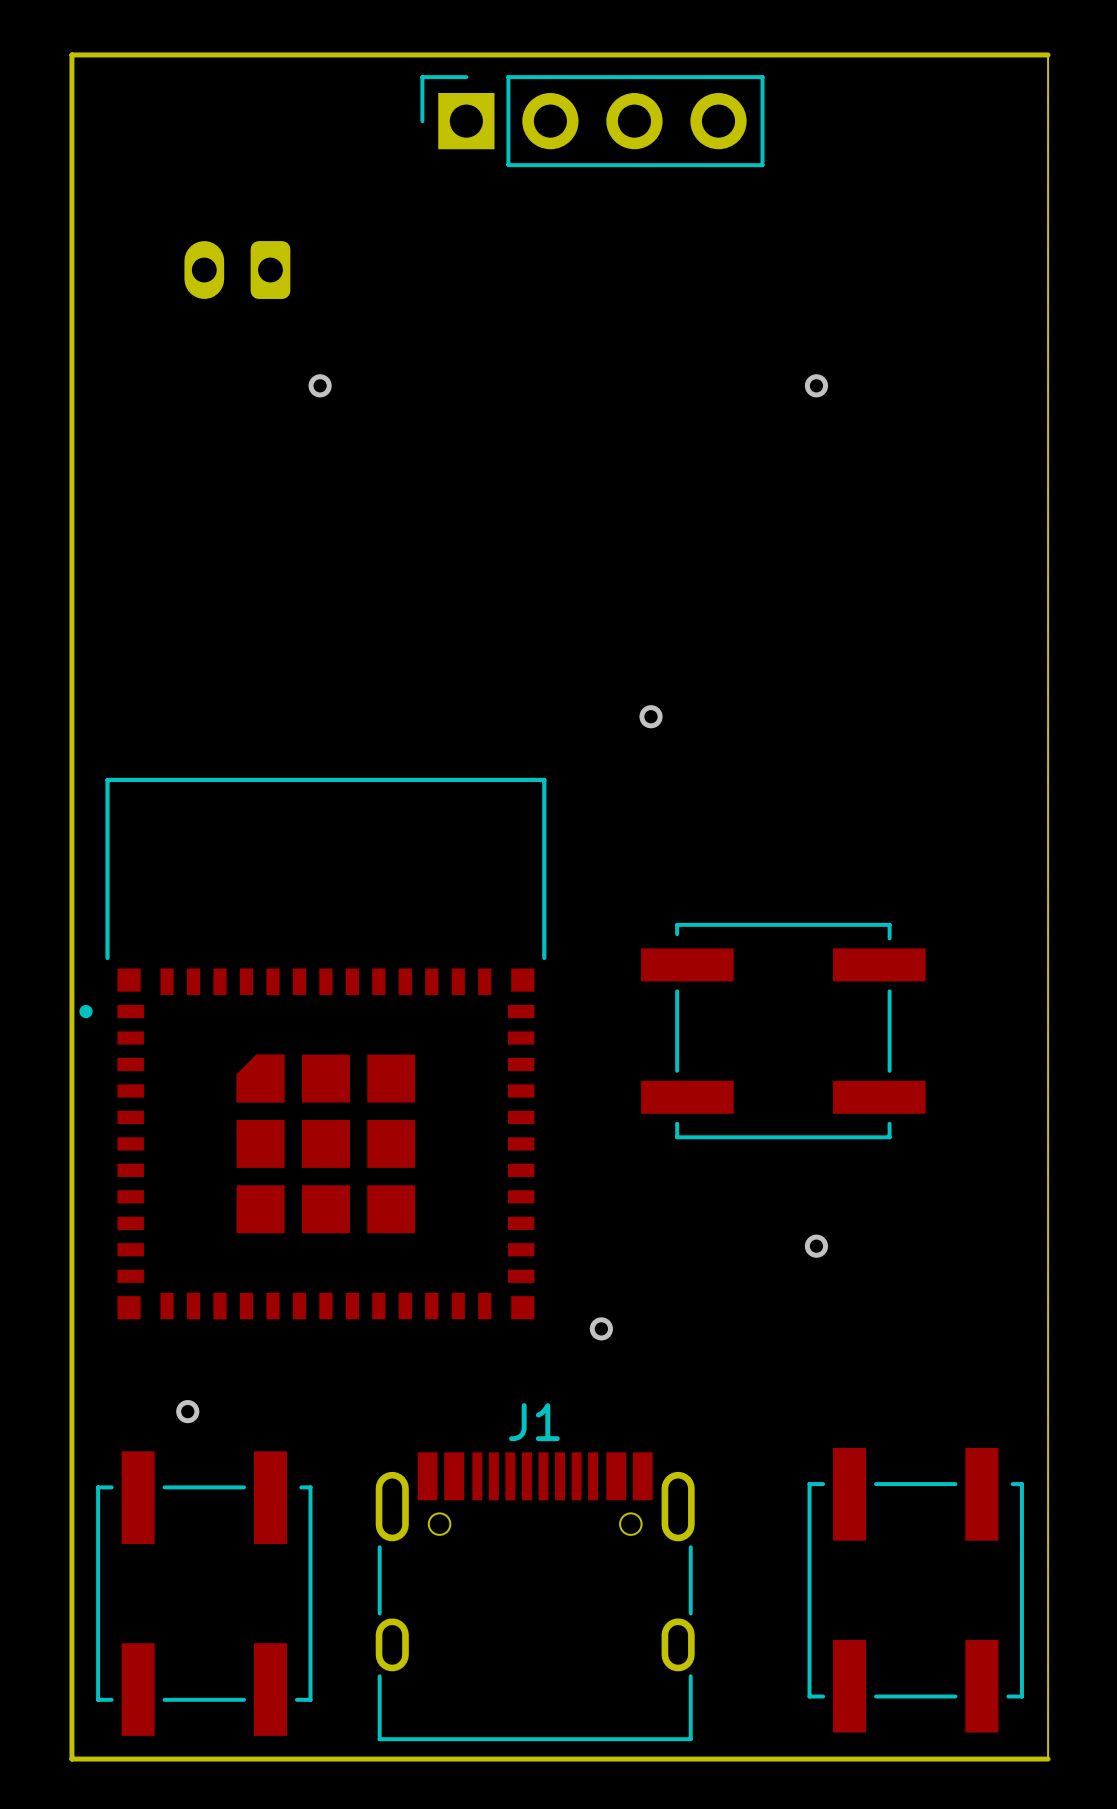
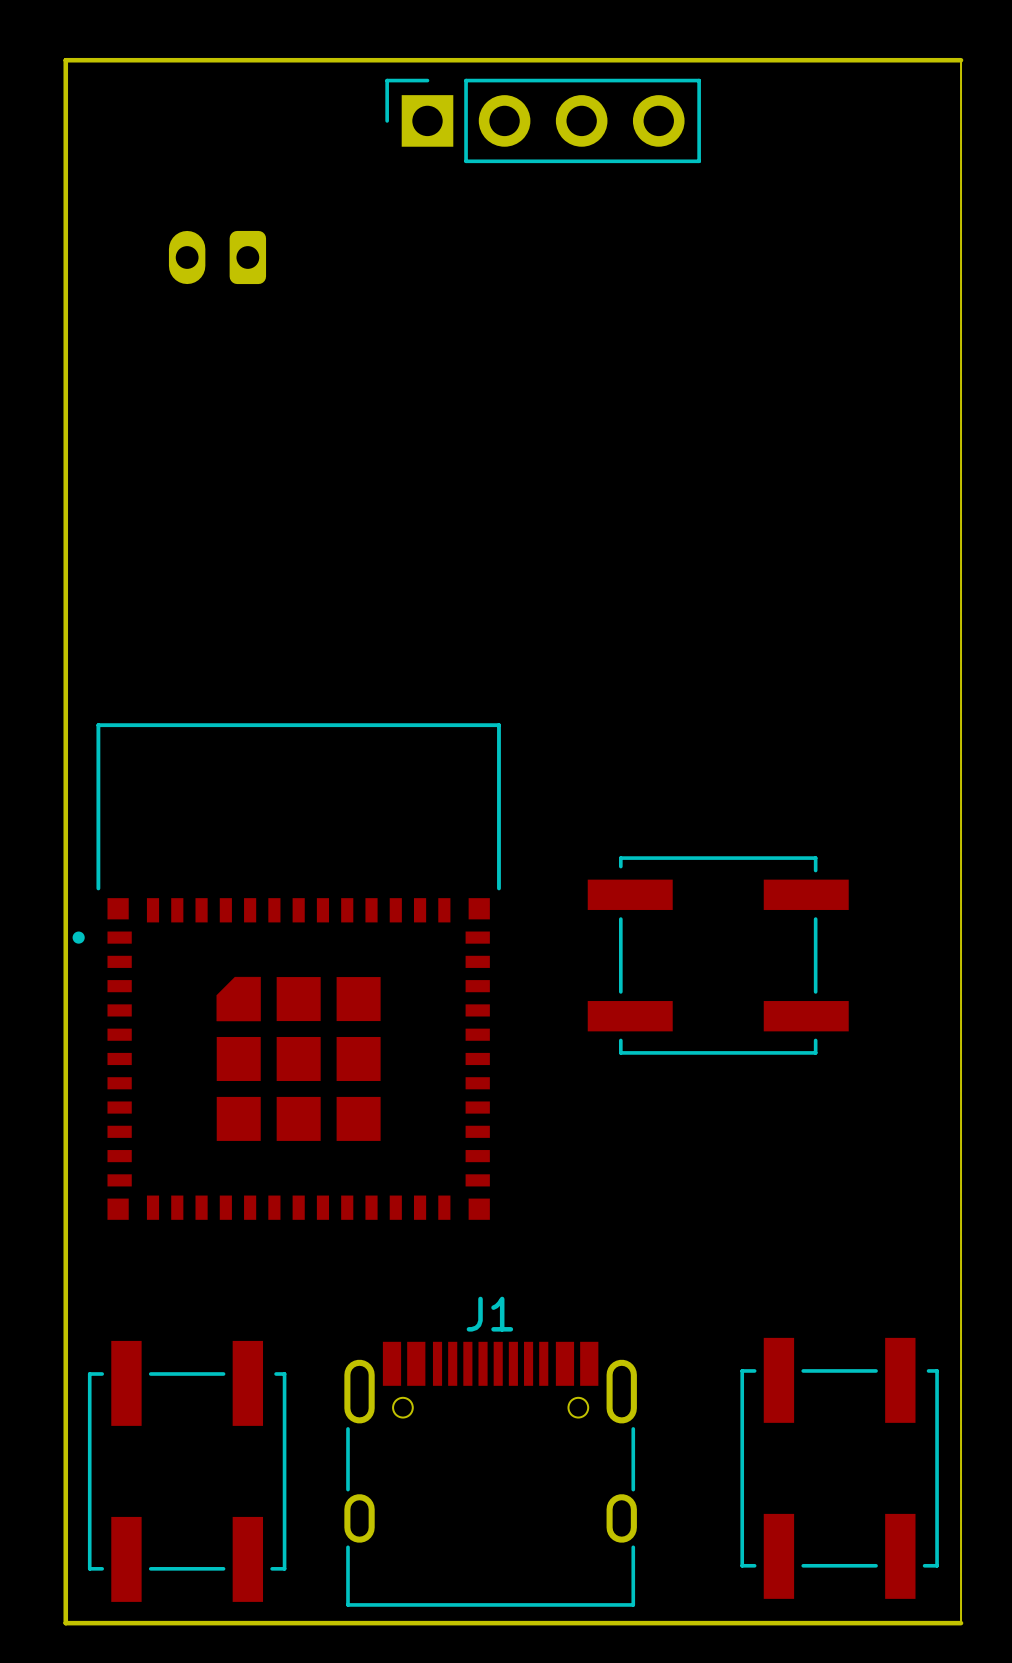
via: (320, 385) -> none
via: (816, 385) -> none
via: (651, 716) -> none
via: (816, 1246) -> none
via: (601, 1328) -> none
via: (187, 1411) -> none

